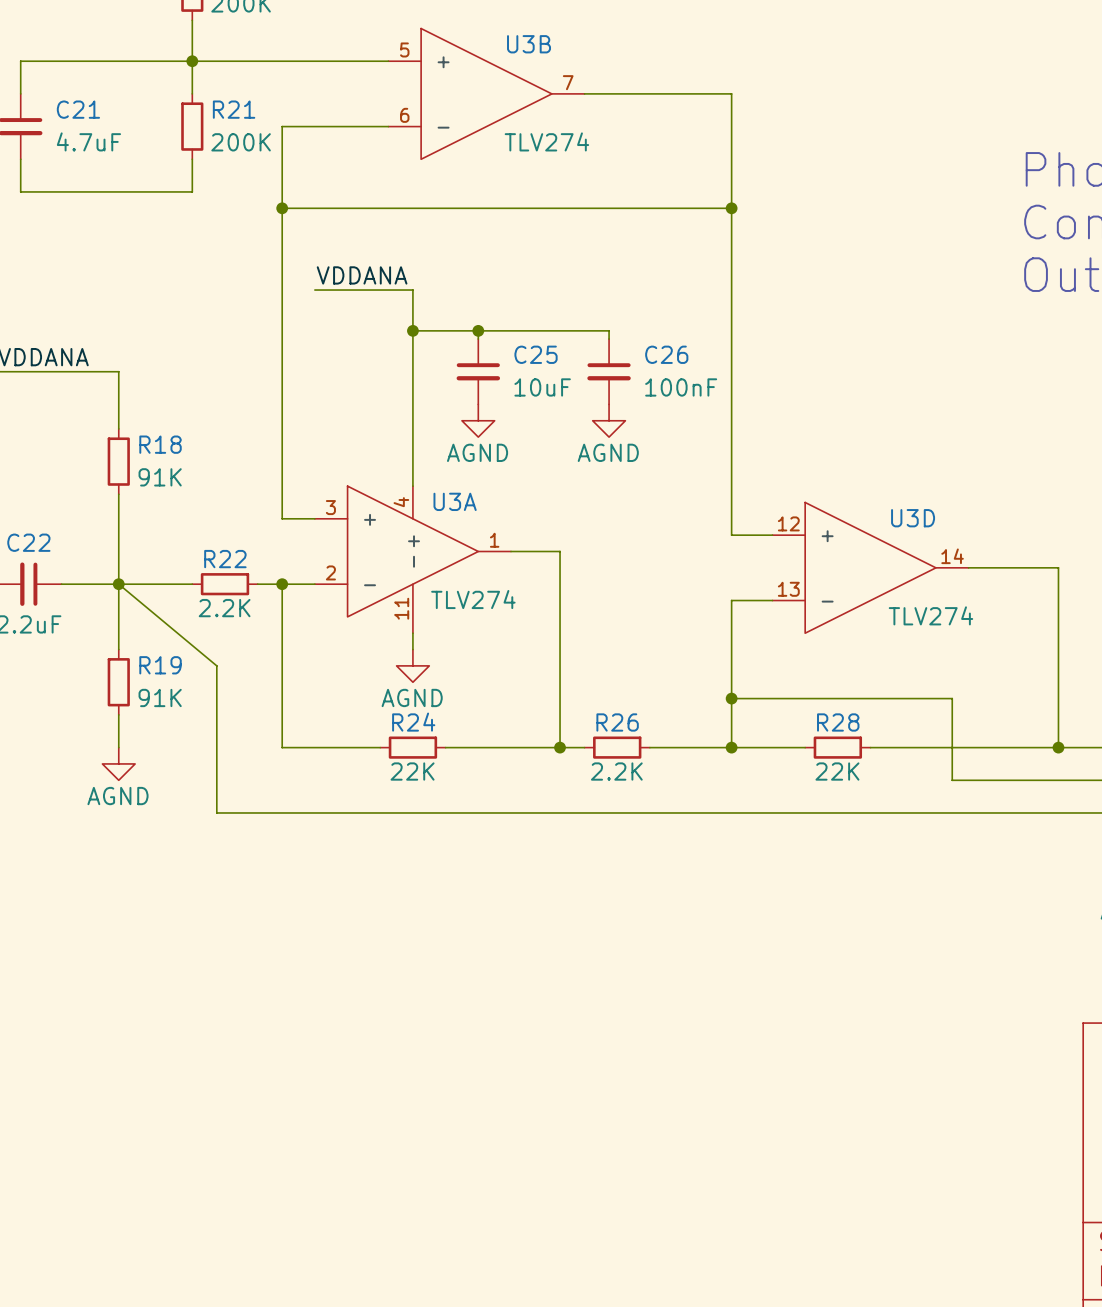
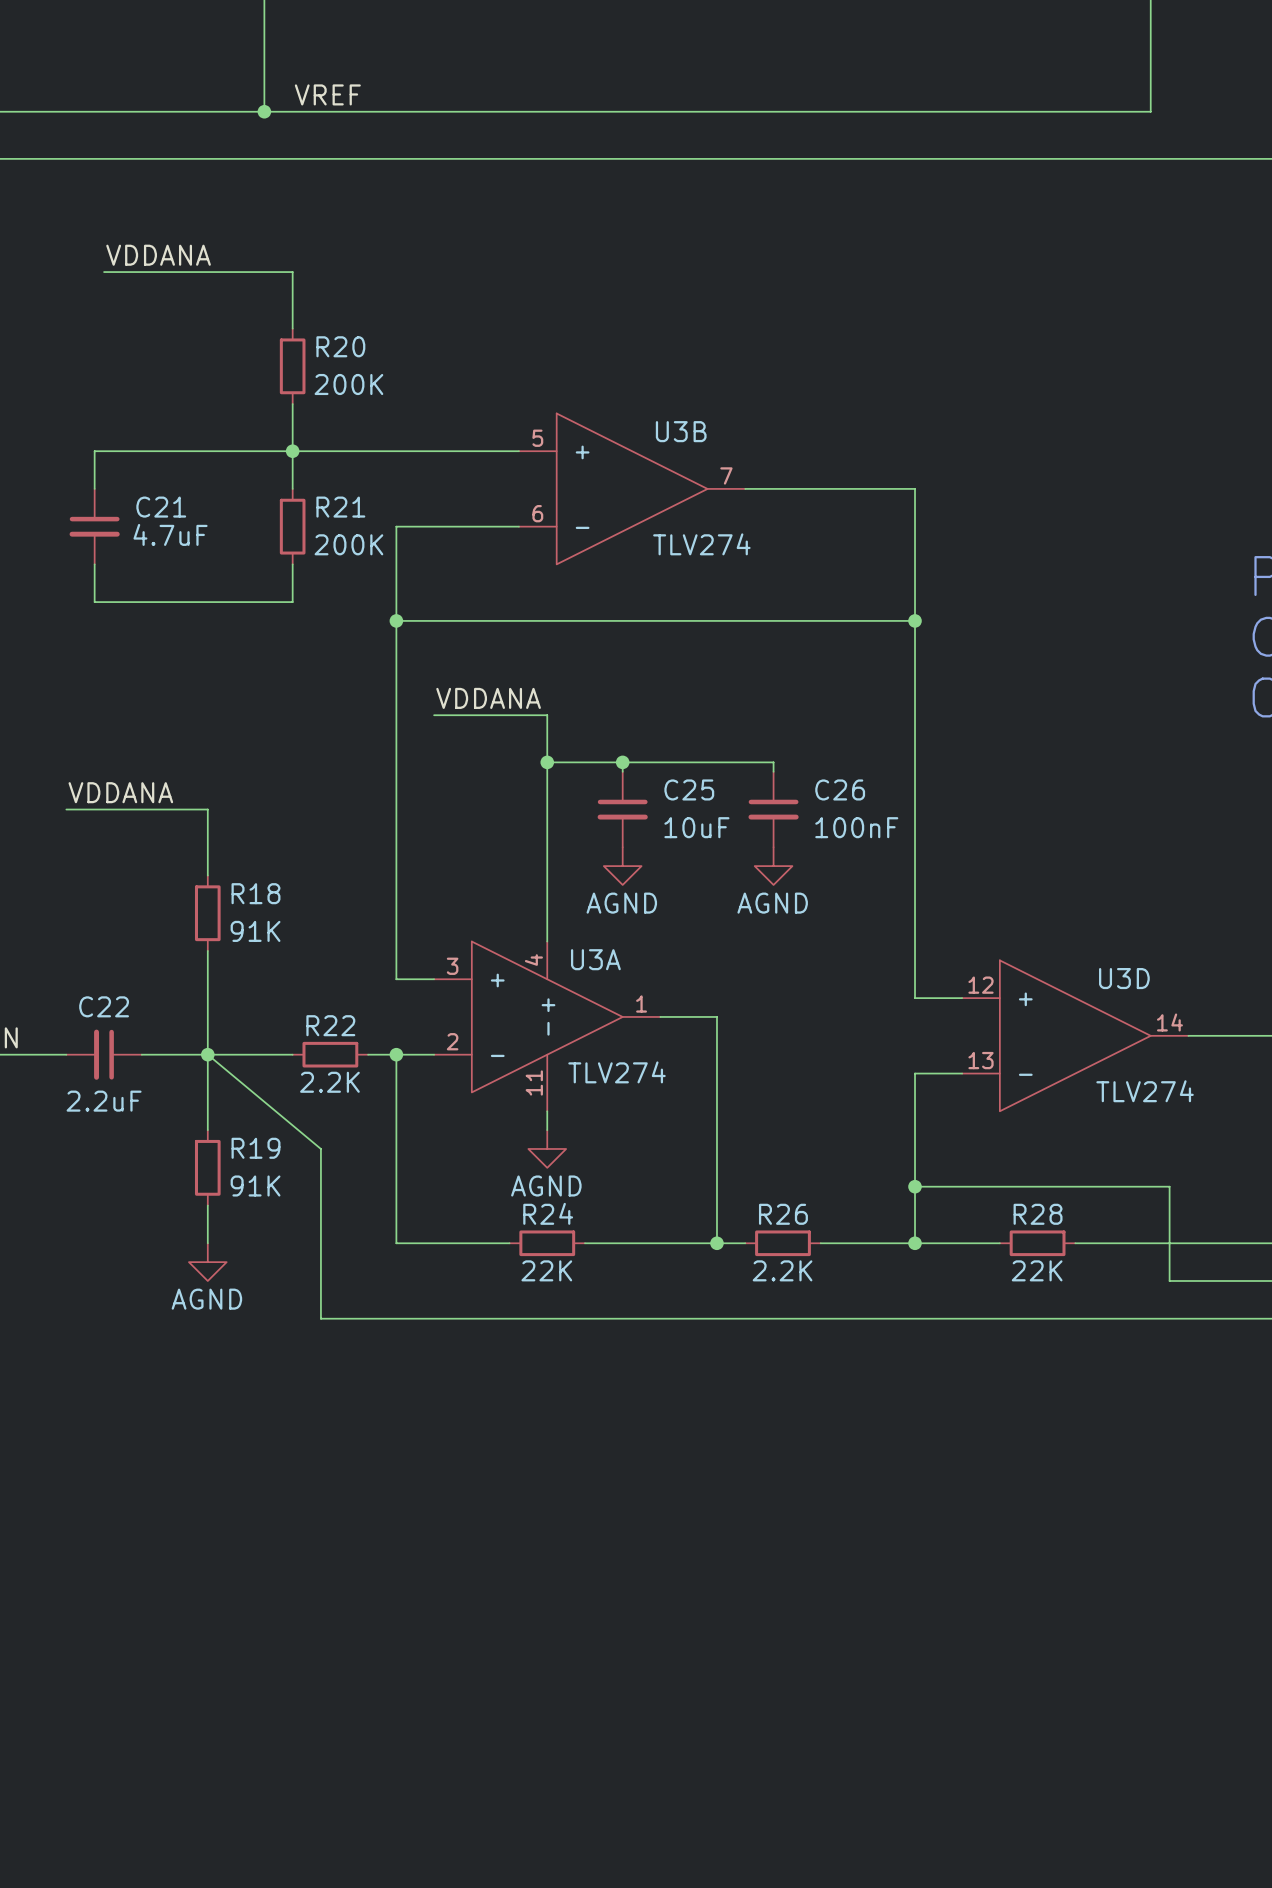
C21 value position: 4.7uF (88, 141) -> 4.7uF (170, 534)

